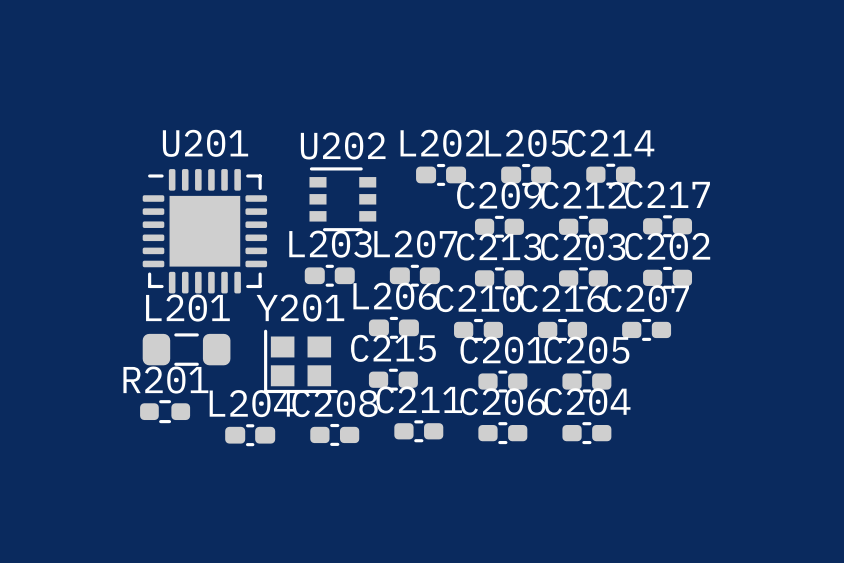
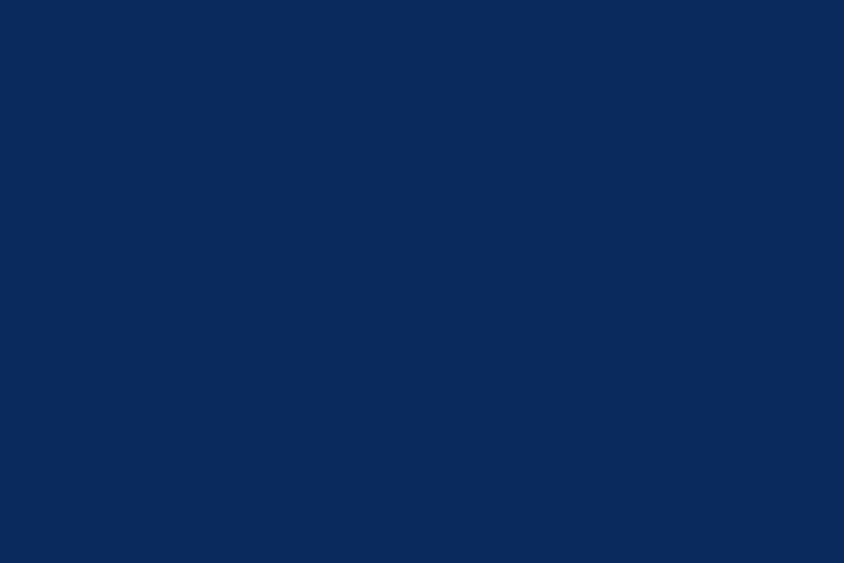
L202: (441, 174) -> none
L205: (526, 174) -> none
C214: (610, 174) -> none
U202: (342, 199) -> none
C209: (499, 226) -> none
C212: (583, 226) -> none
C217: (667, 226) -> none
U201: (204, 231) -> none
L203: (329, 275) -> none
L207: (414, 275) -> none
C202: (667, 277) -> none
C213: (499, 278) -> none
C203: (583, 278) -> none
L206: (393, 327) -> none
C210: (478, 329) -> none
C216: (562, 329) -> none
C207: (646, 329) -> none
L201: (186, 349) -> none
Y201: (300, 361) -> none
C215: (393, 379) -> none
C201: (502, 381) -> none
C205: (586, 381) -> none
R201: (165, 411) -> none
C211: (418, 431) -> none
C206: (502, 433) -> none
C204: (586, 433) -> none
C208: (334, 434) -> none
L204: (250, 435) -> none

